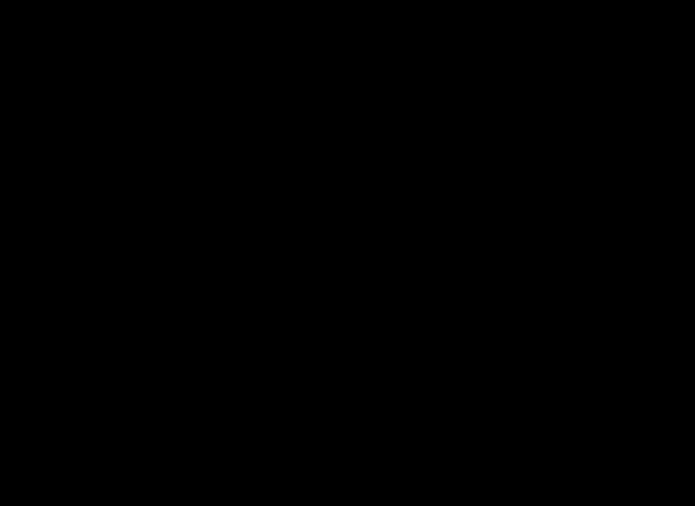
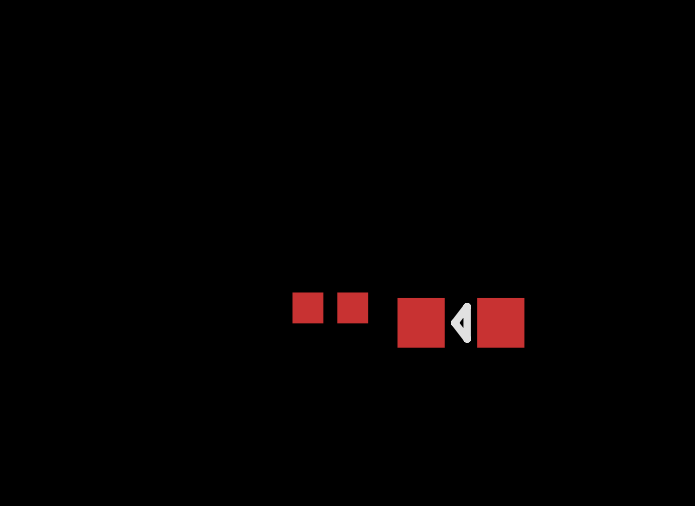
part: none -> (330, 307)
part: none -> (460, 322)

